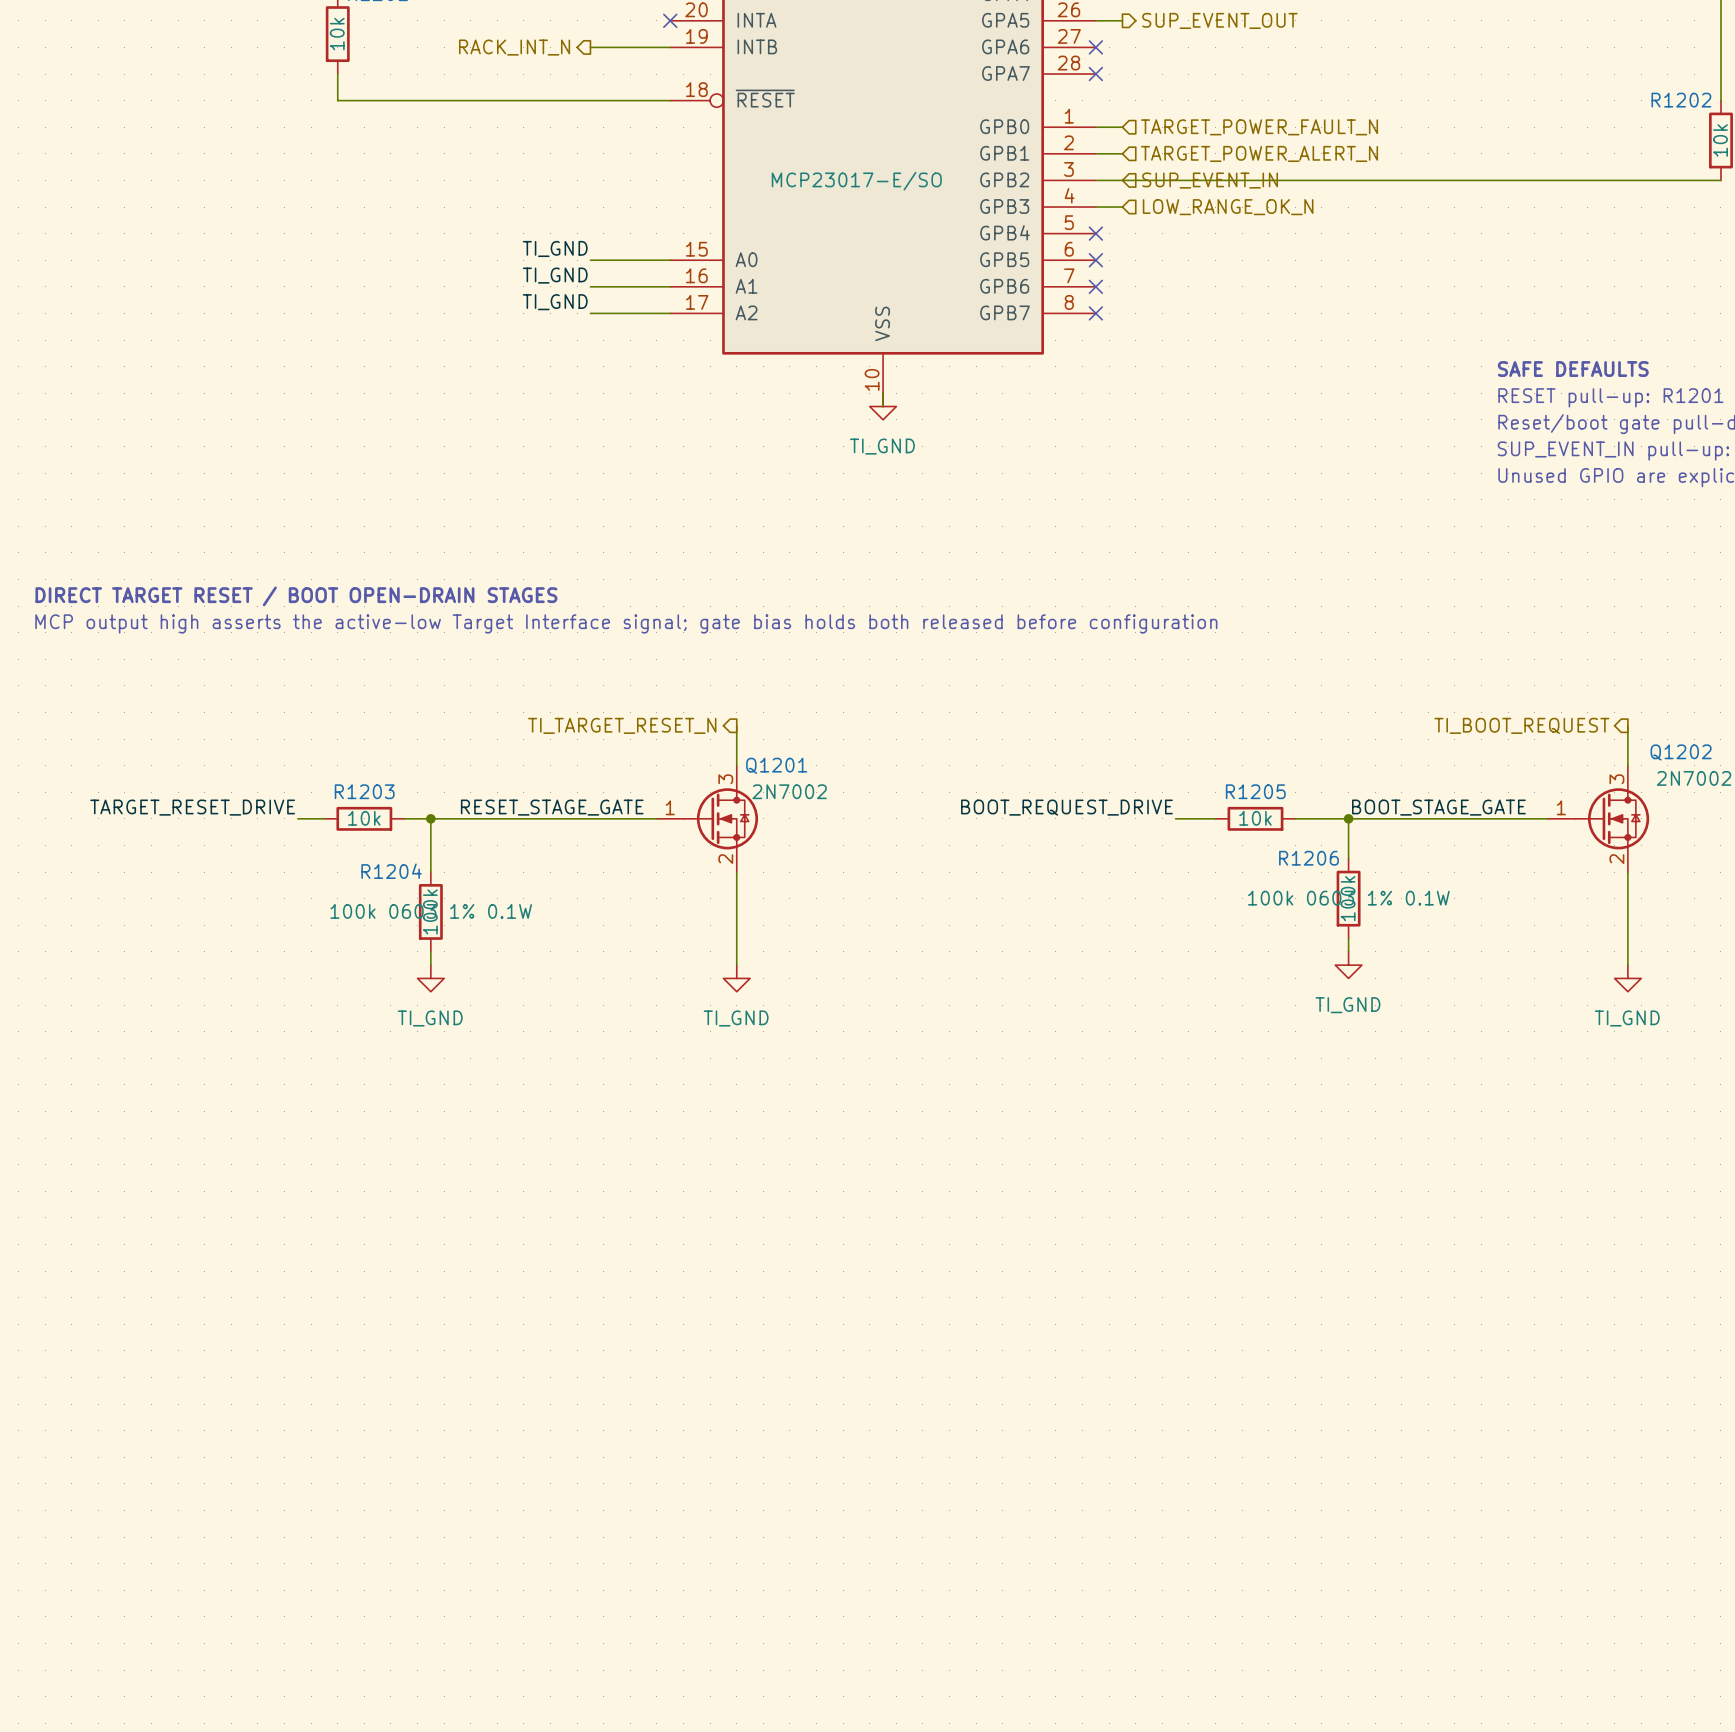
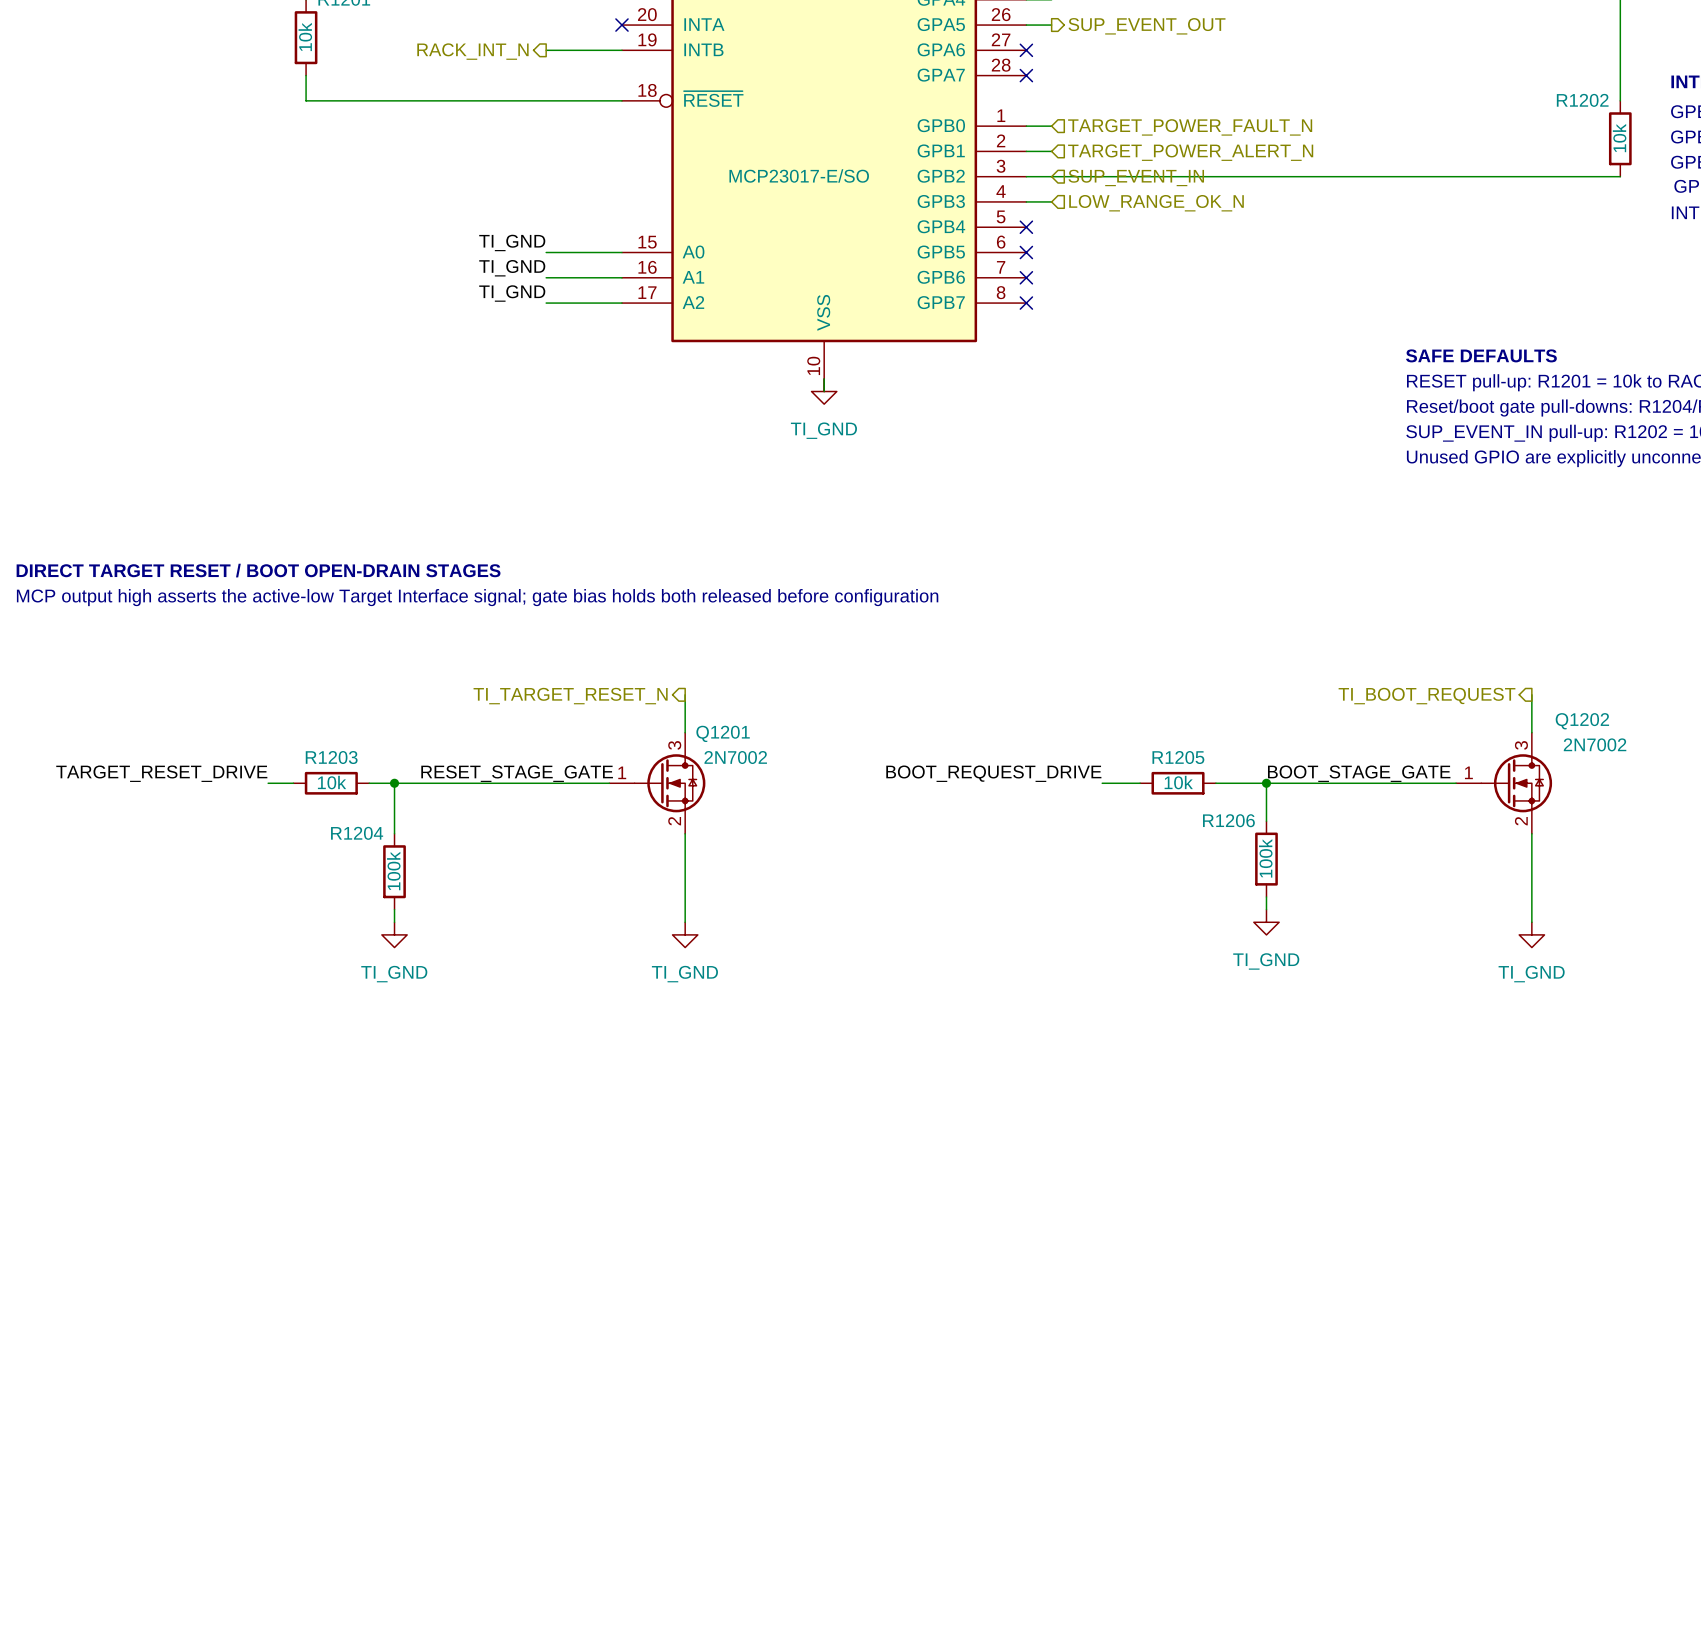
R1206 text: 100k 0603 1% 0.1W (1348, 898) -> none
R1204 text: 100k 0603 1% 0.1W (431, 911) -> none

